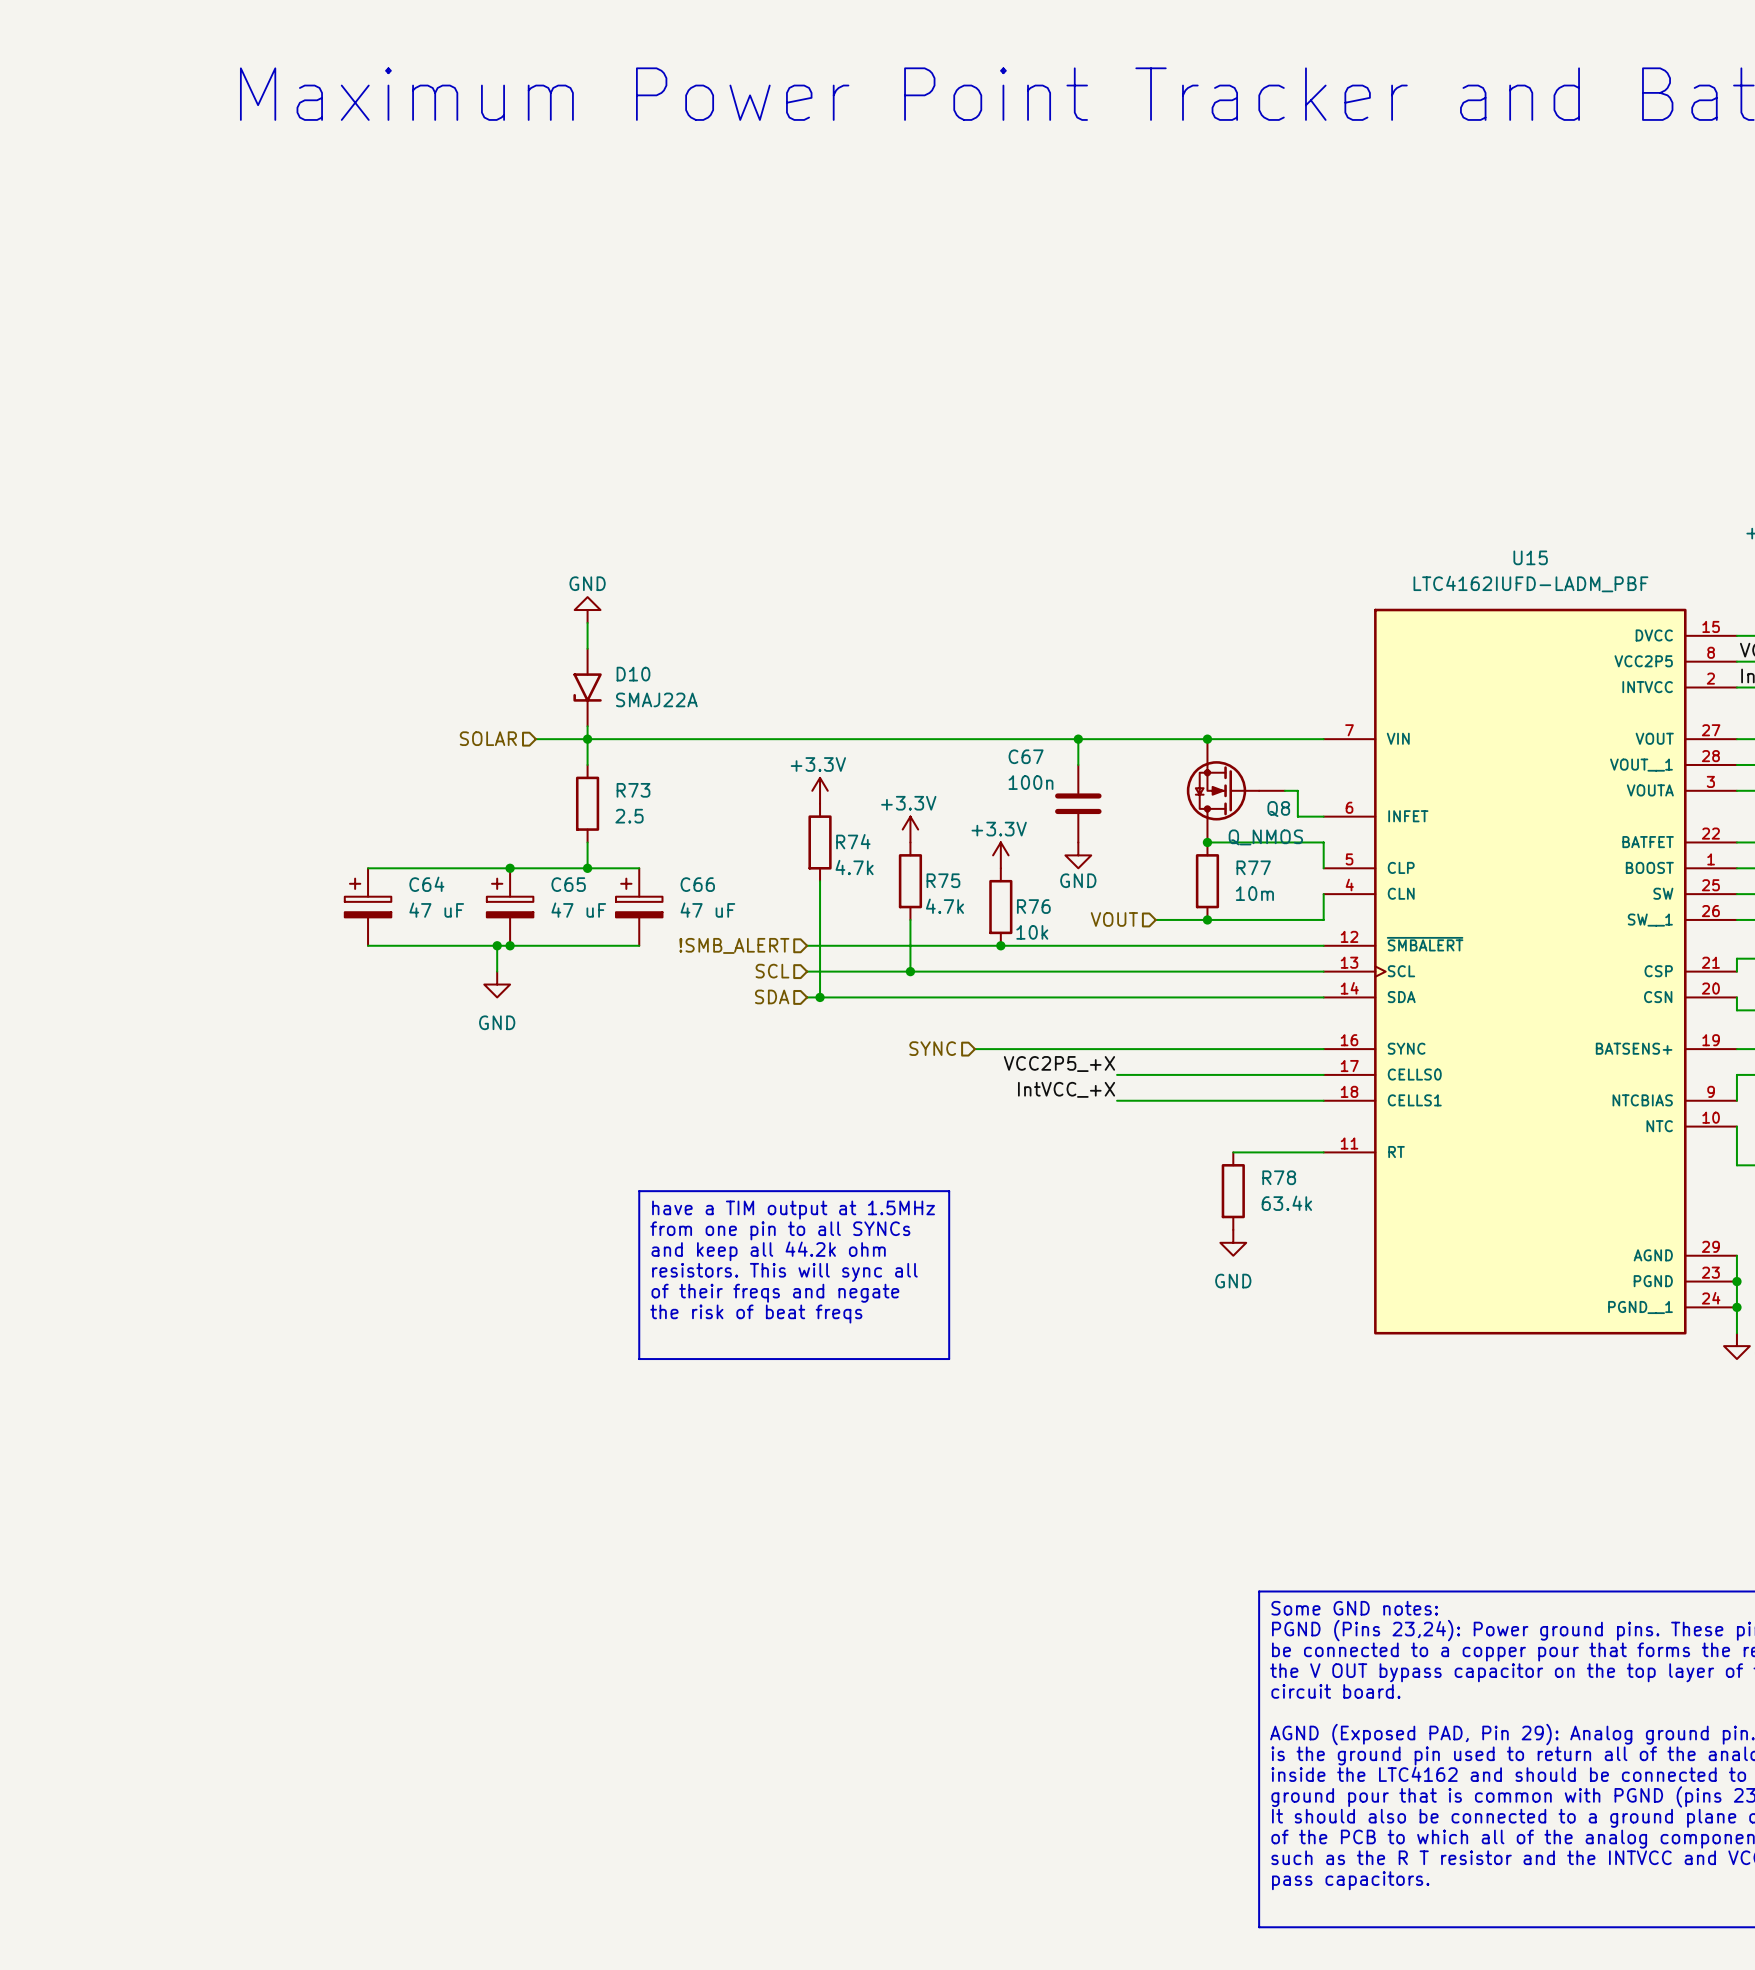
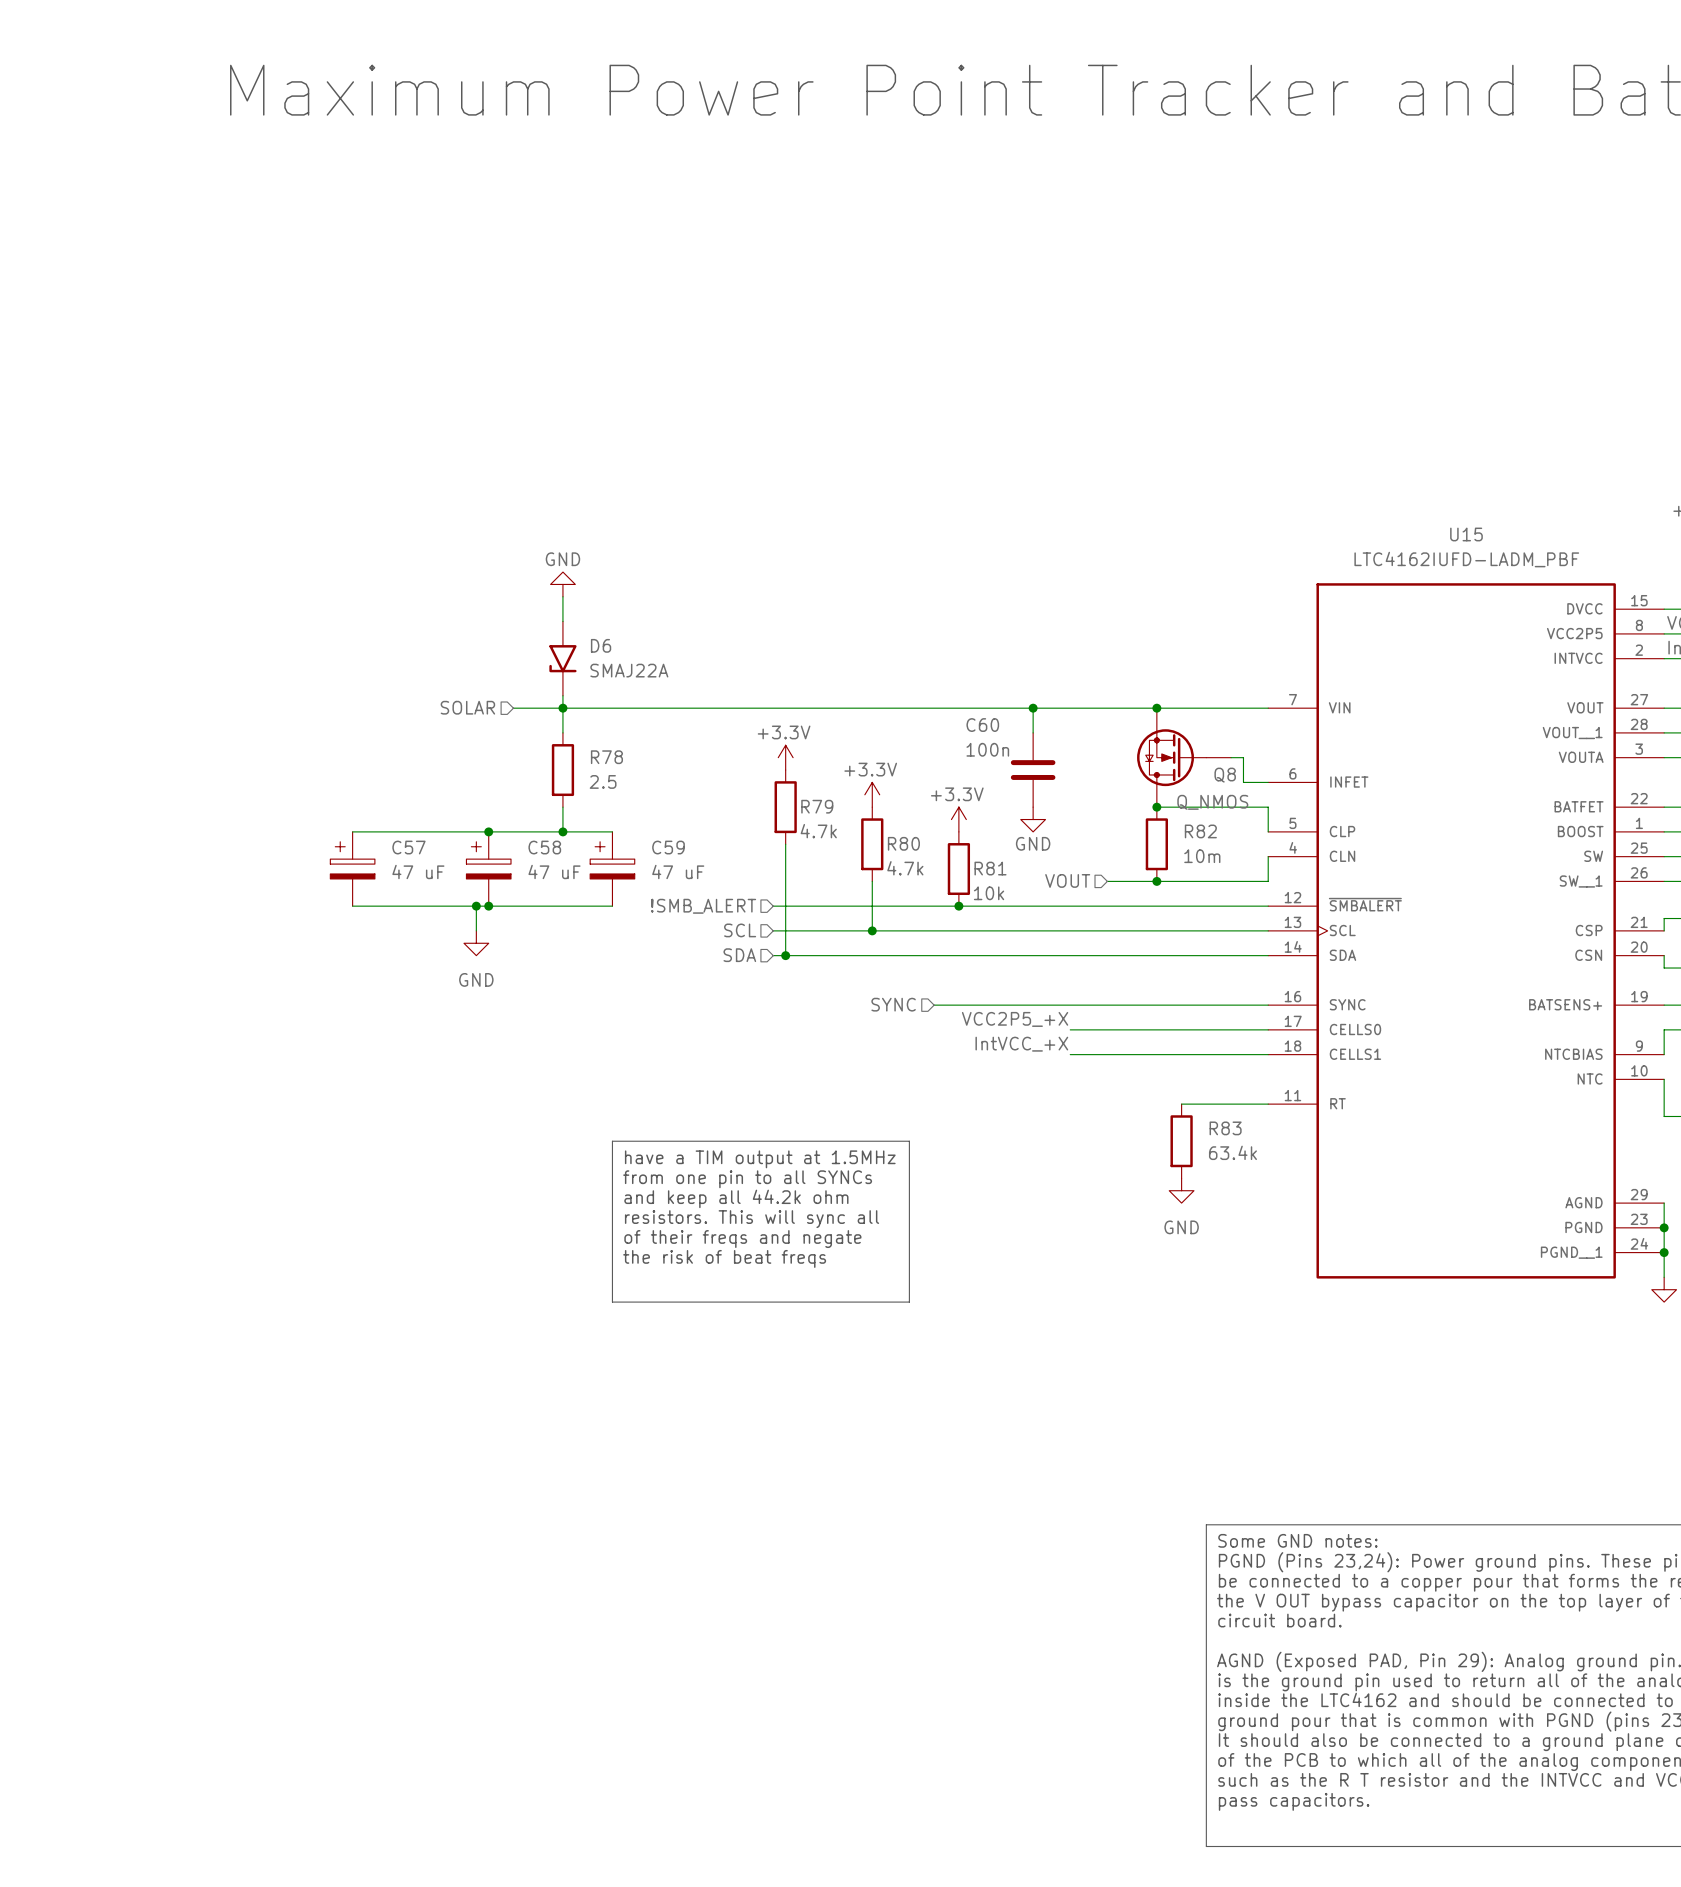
D10 name: D10 (633, 674) -> D6 (601, 645)
C67 name: C67 (1026, 756) -> C60 (982, 725)
R73 name: R73 (633, 790) -> R78 (606, 757)
R74 name: R74 (853, 841) -> R79 (817, 806)
R77 name: R77 (1253, 867) -> R82 (1200, 831)
R75 name: R75 (943, 880) -> R80 (903, 843)
C64 name: C64 (426, 884) -> C57 (408, 847)
C65 name: C65 (568, 884) -> C58 (544, 847)
C66 name: C66 (697, 884) -> C59 (668, 847)
R76 name: R76 (1033, 906) -> R81 (990, 868)
R78 name: R78 (1279, 1177) -> R83 (1225, 1128)

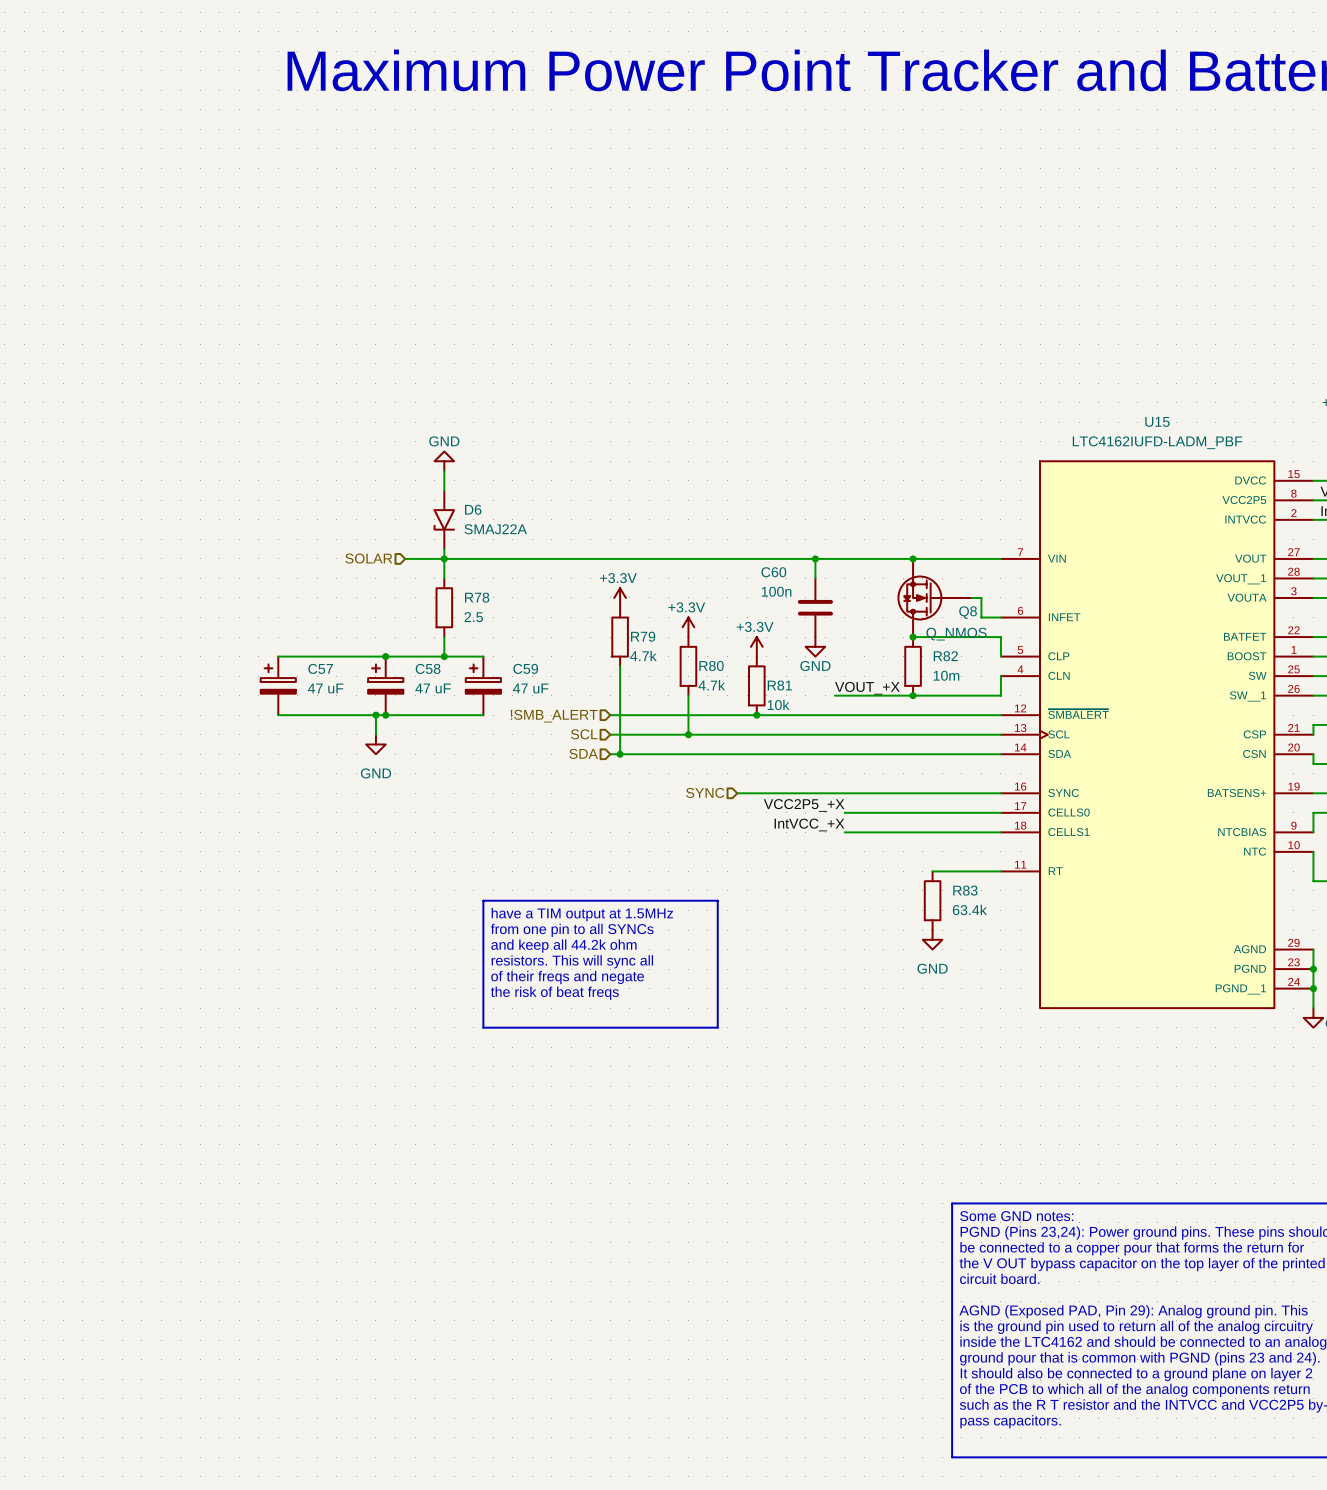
label: none -> VOUT_+X (867, 688)
hierarchical label: VOUT (1067, 880) -> none
wire: none -> (834, 695) (874, 695)

